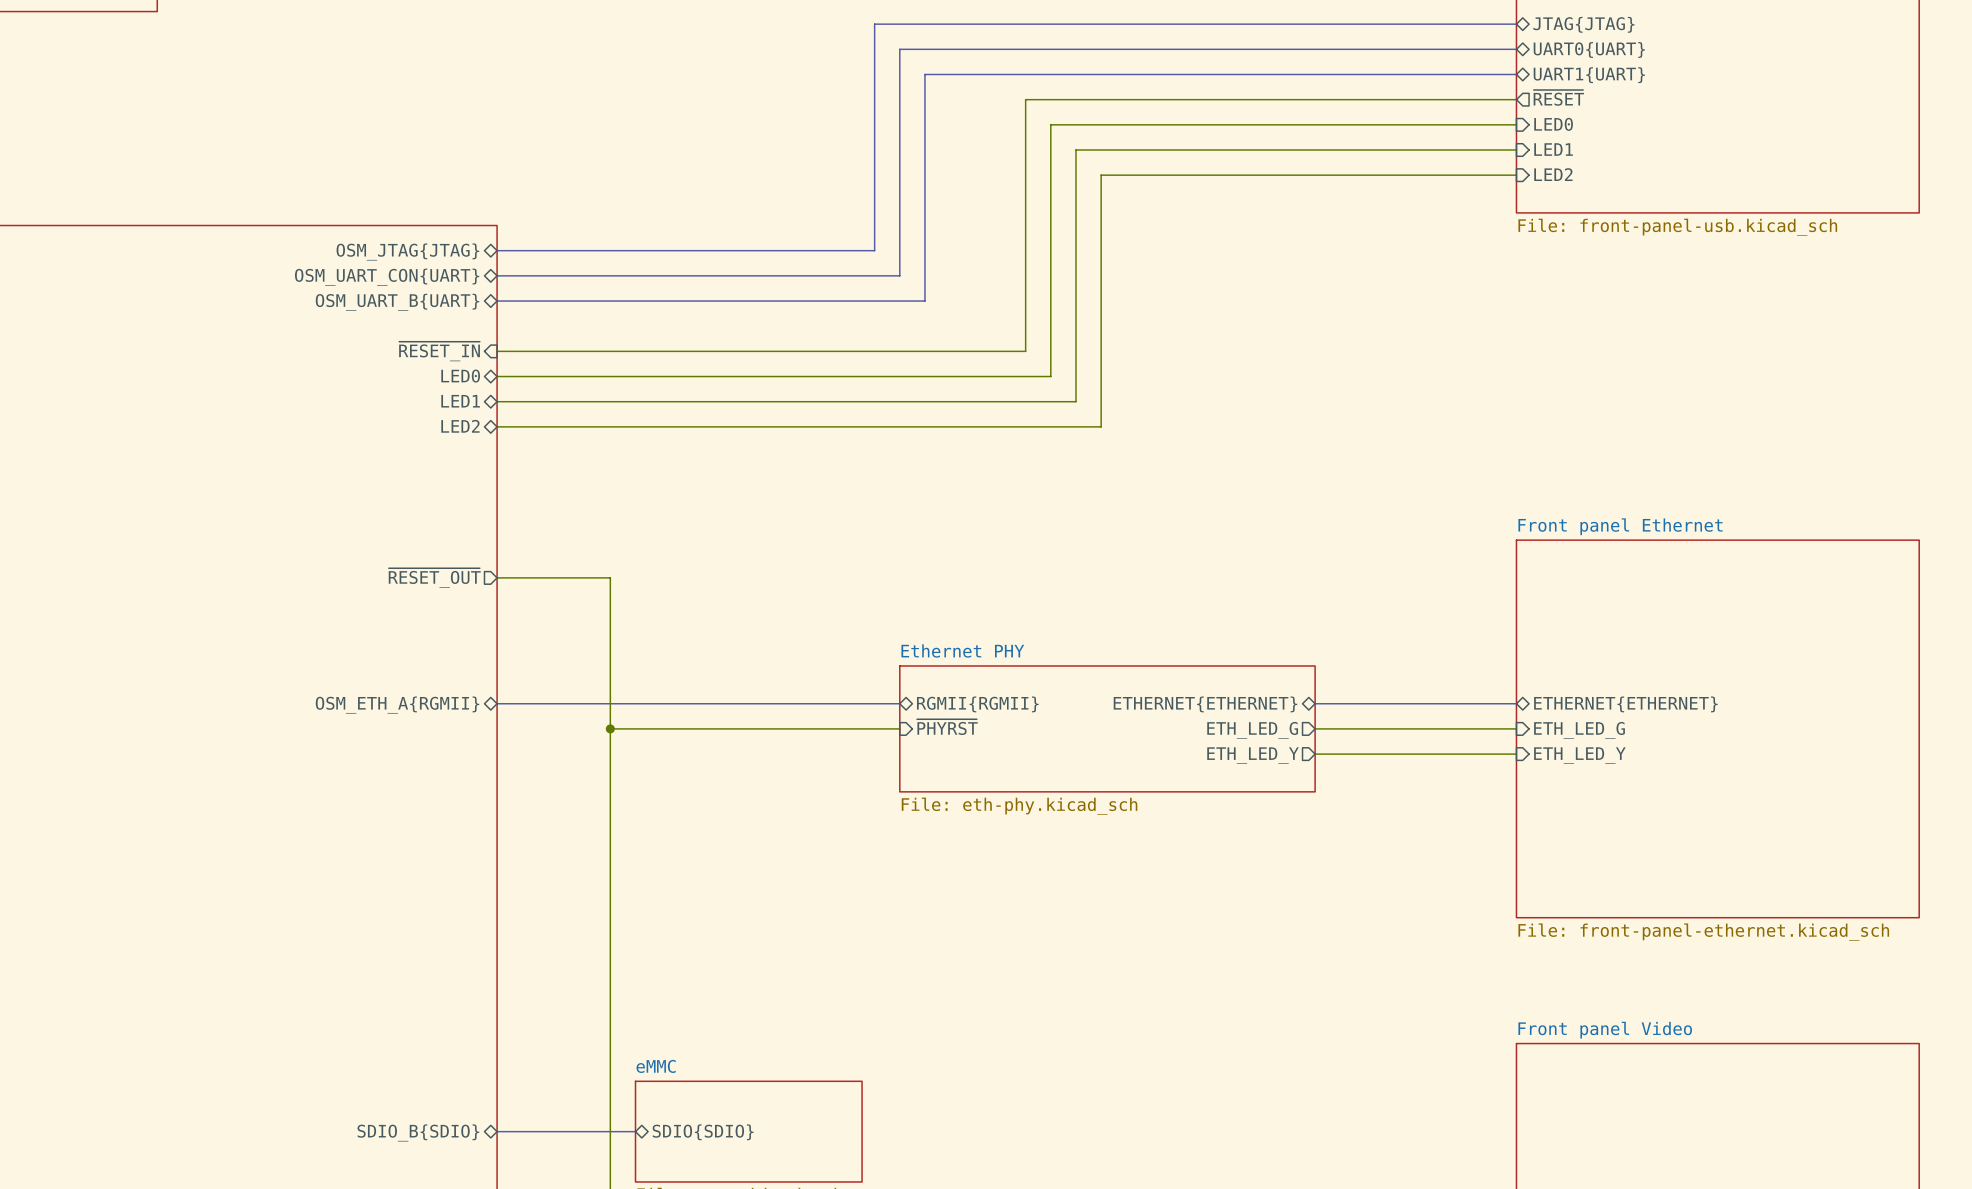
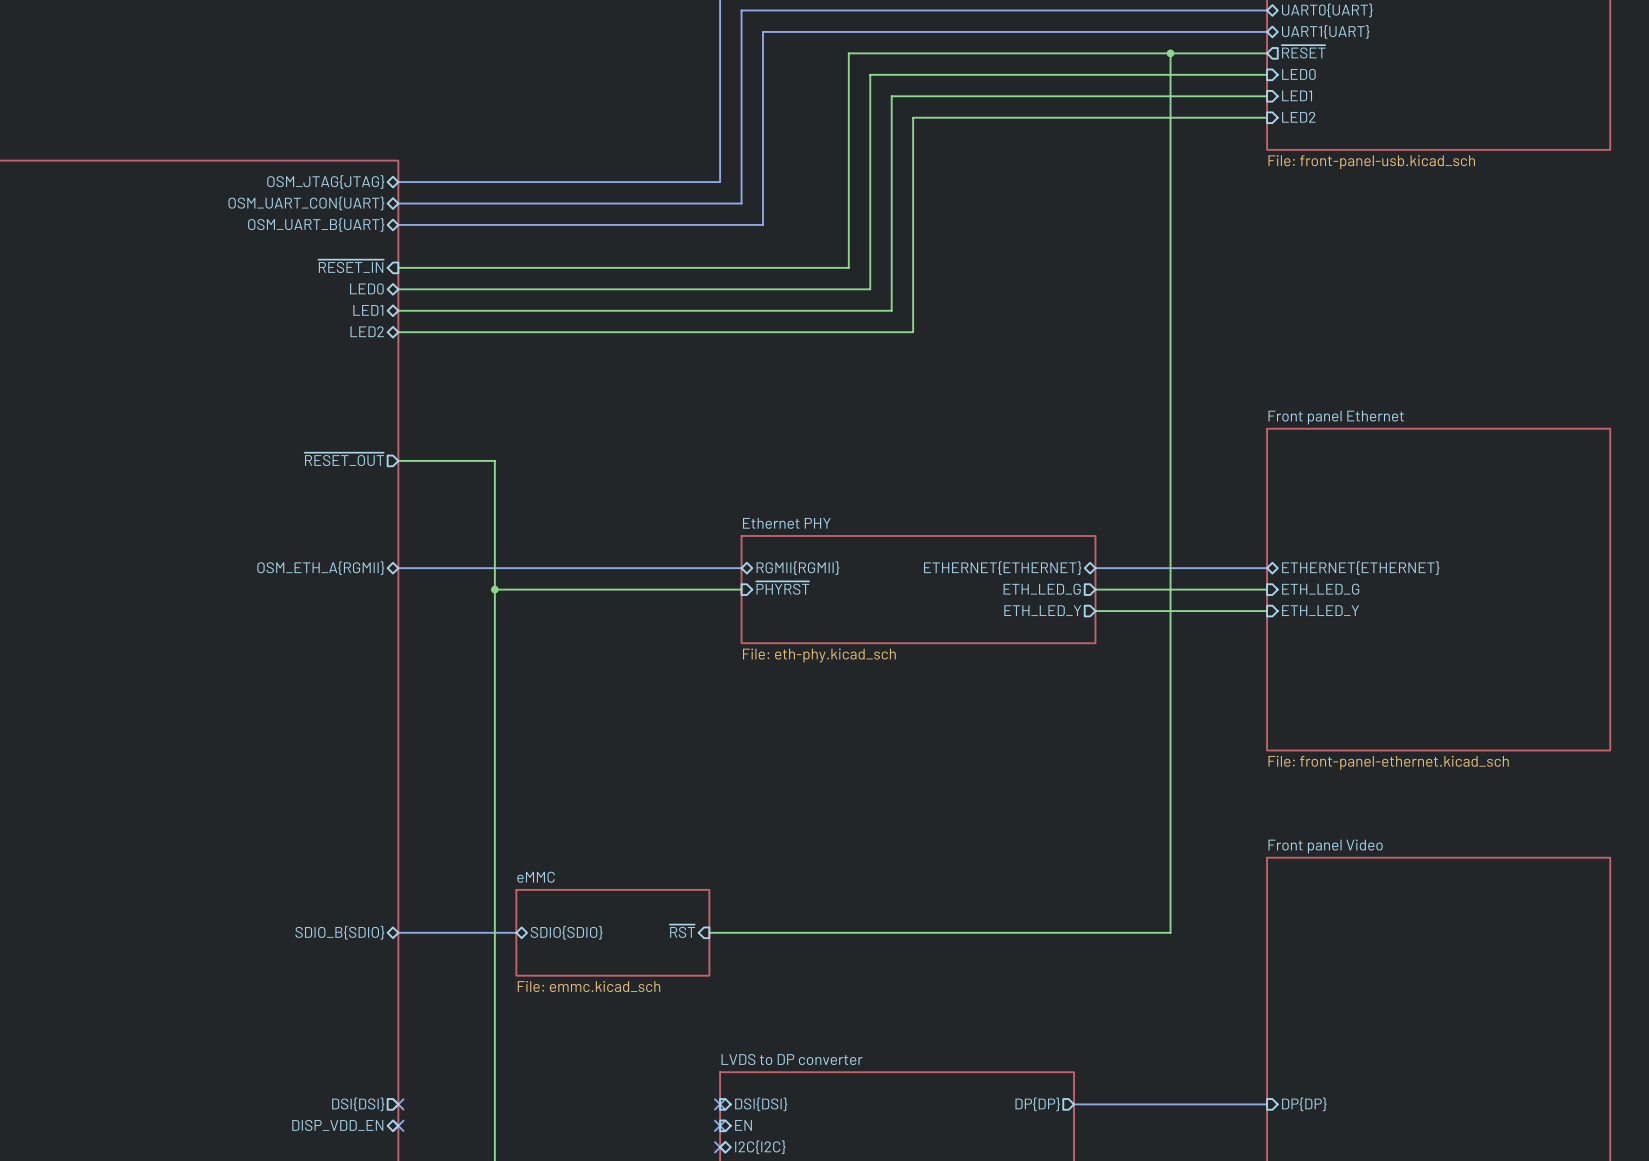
wire: none -> (1170, 53) (1170, 932) (709, 932)
junction: none -> (1170, 53)
sheet pin: none -> ~{RST} (682, 931)

